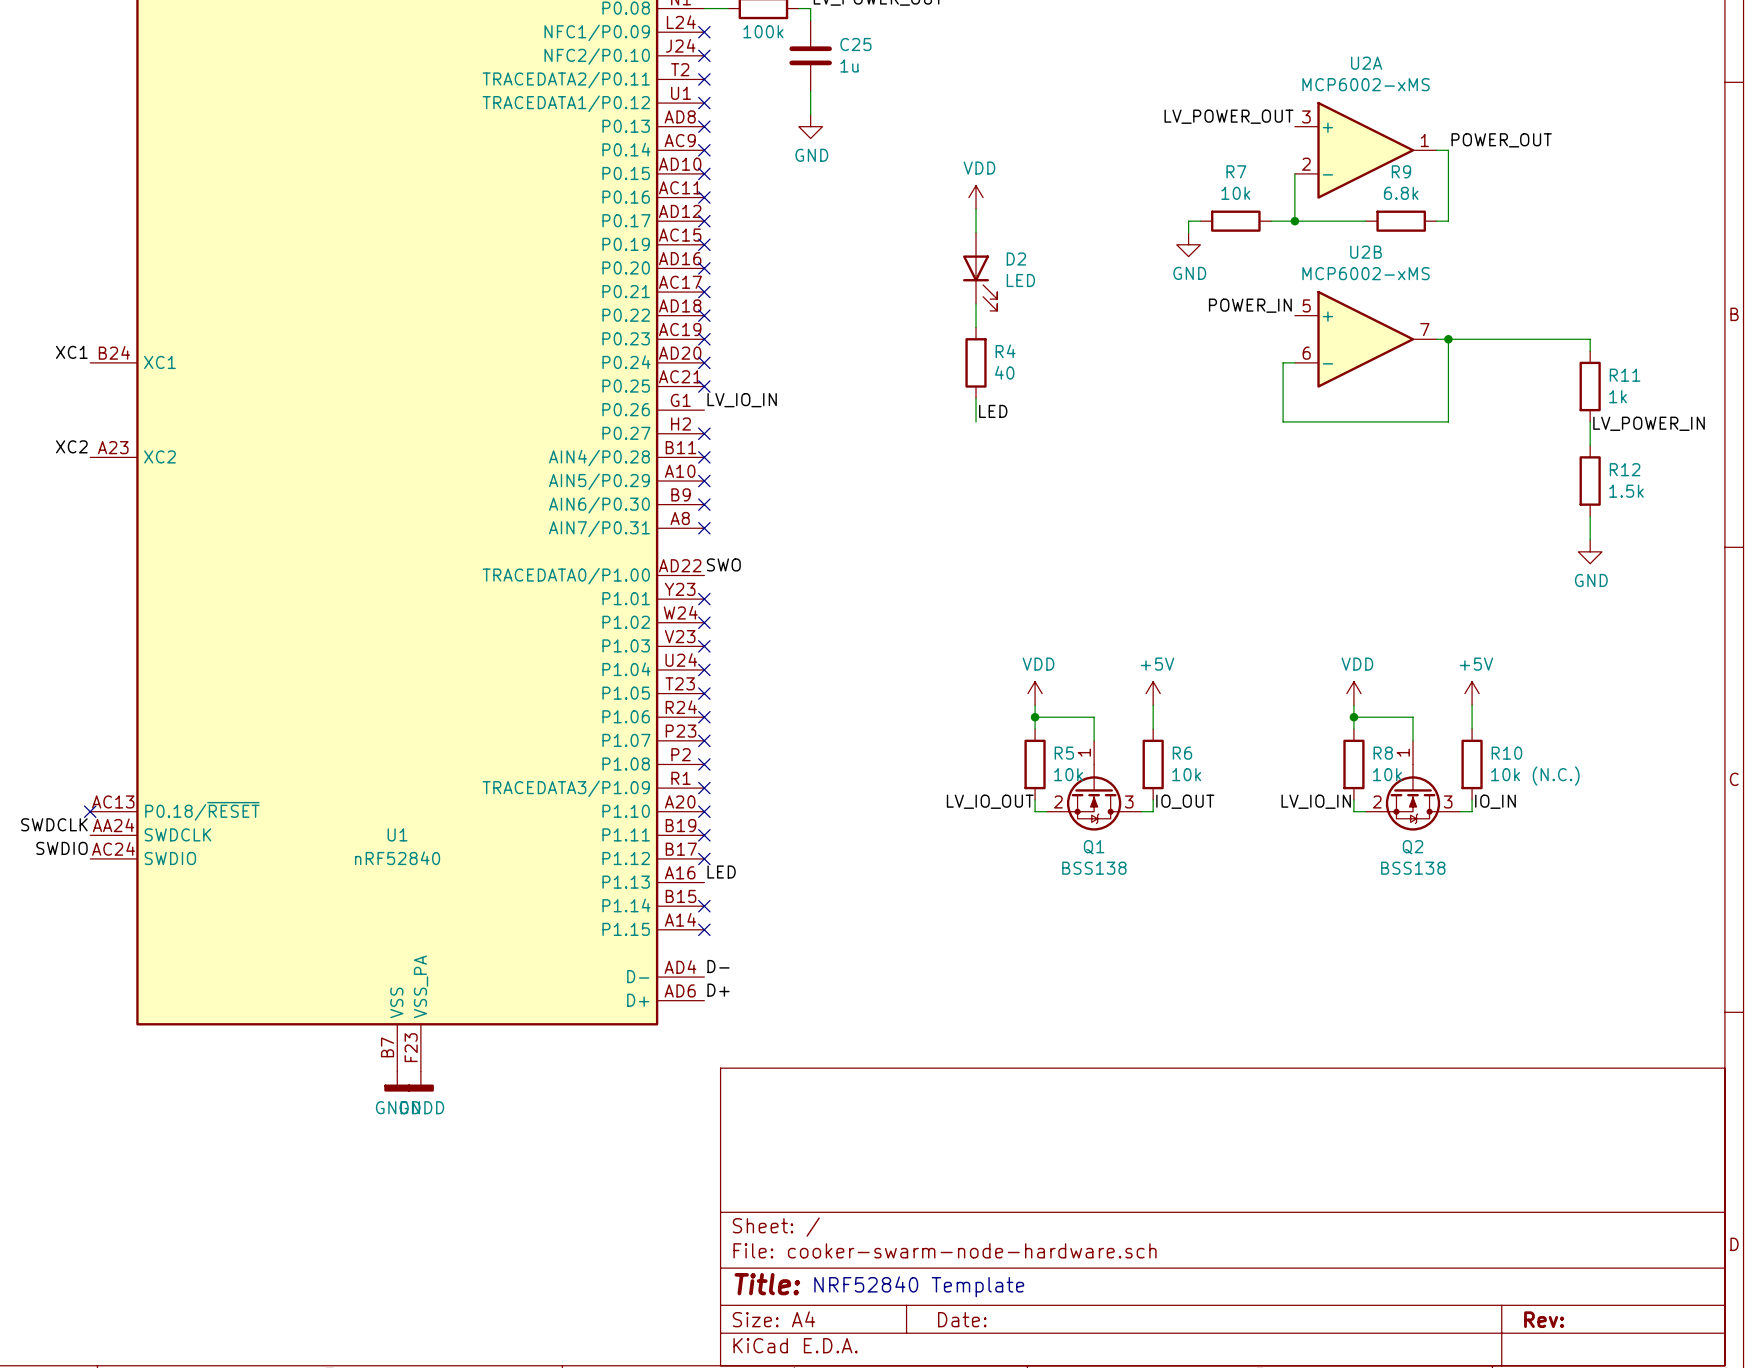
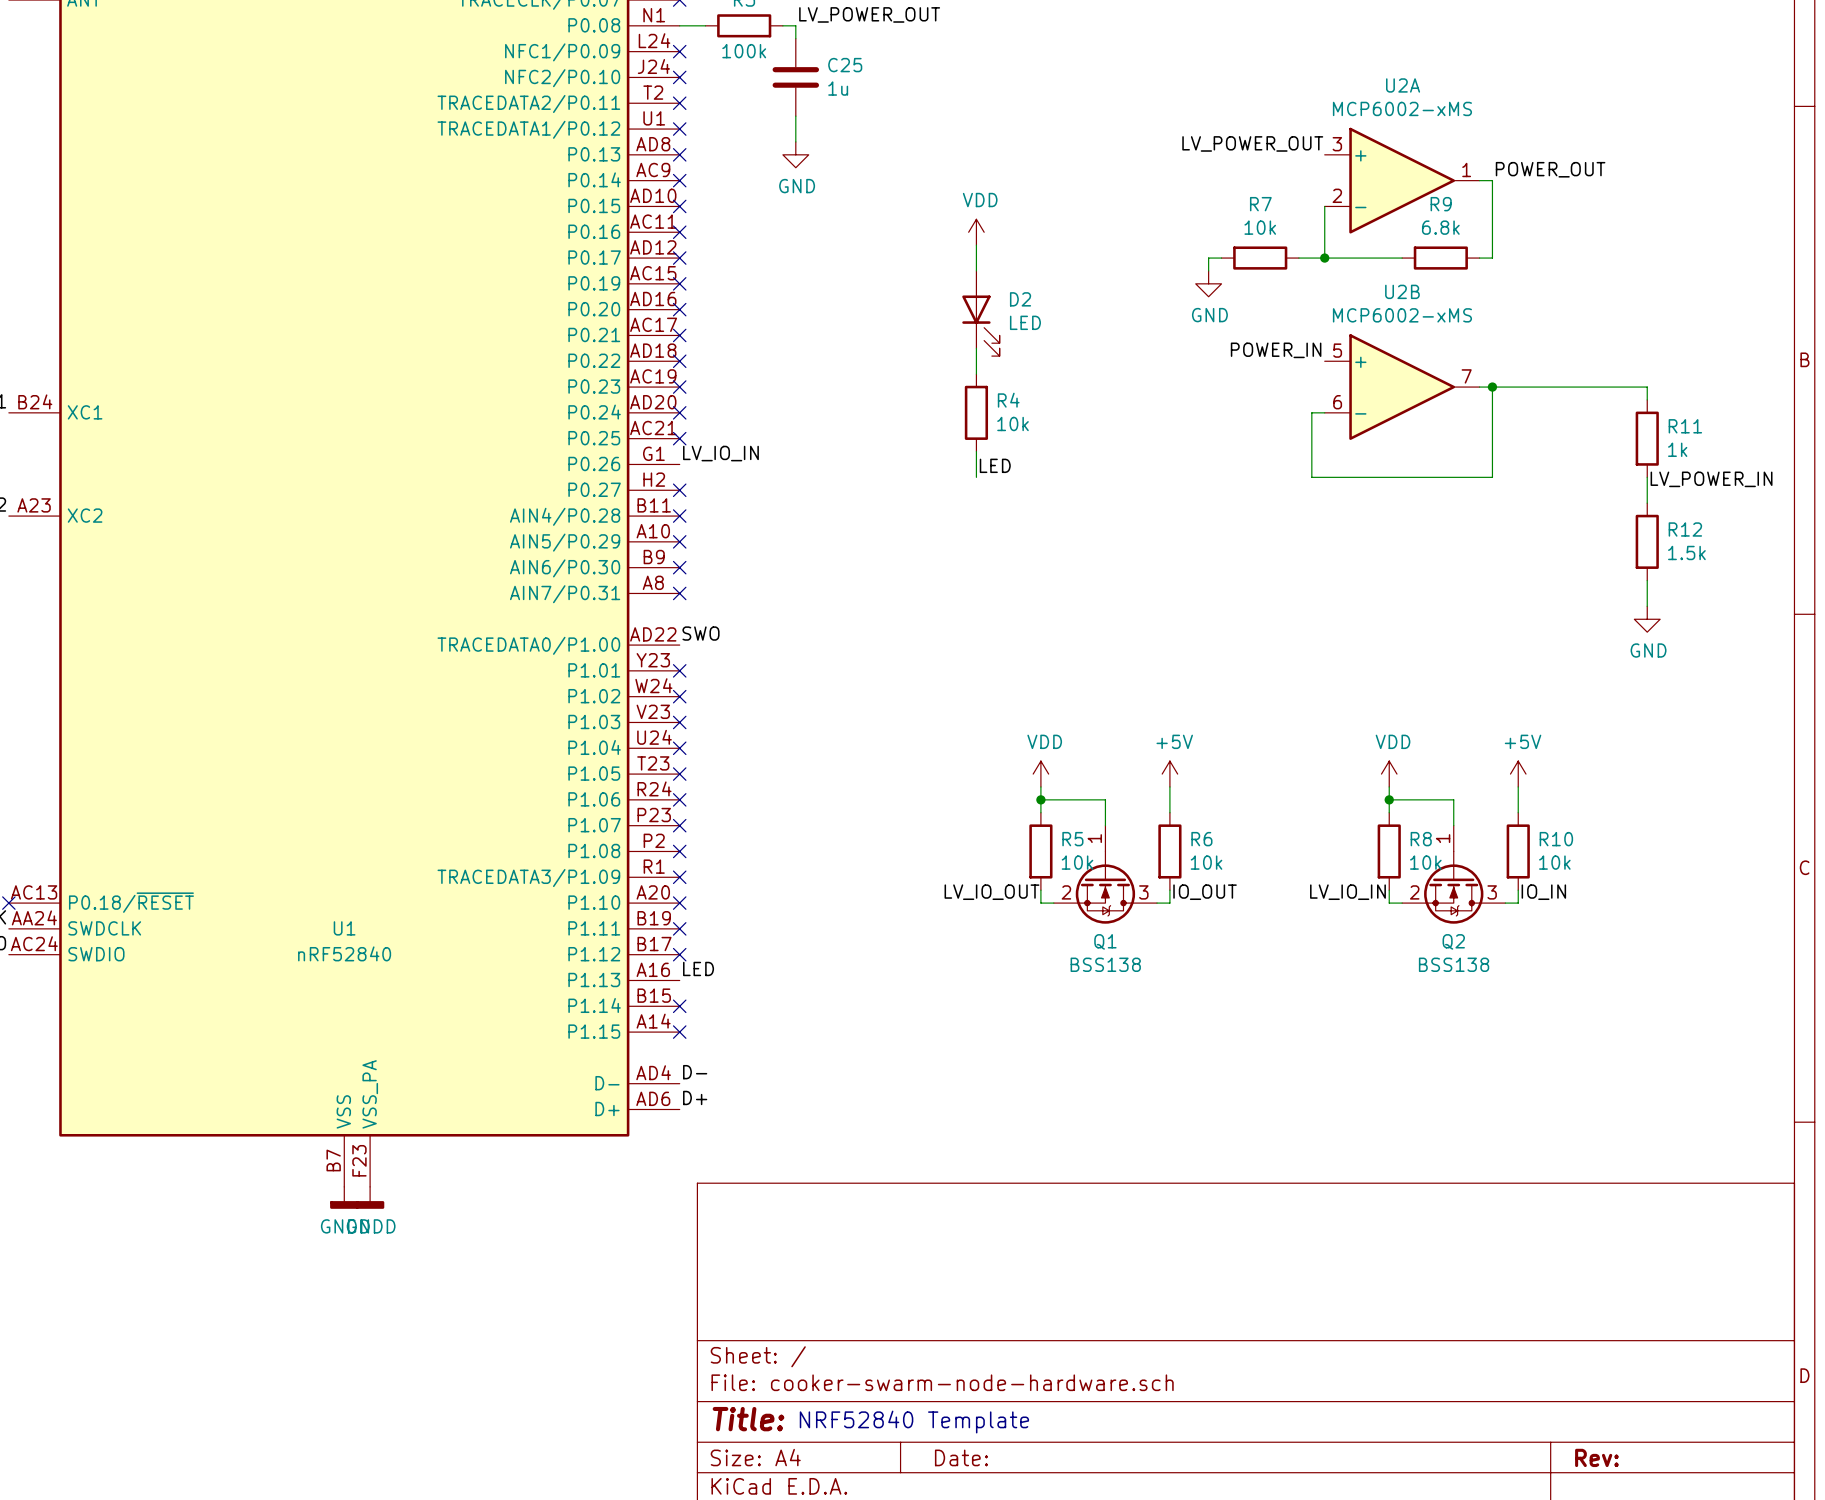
R4 value: 40 (1004, 372) -> 10k (1013, 423)
R10 value: 10k (N.C.) (1535, 776) -> 10k (1554, 862)

